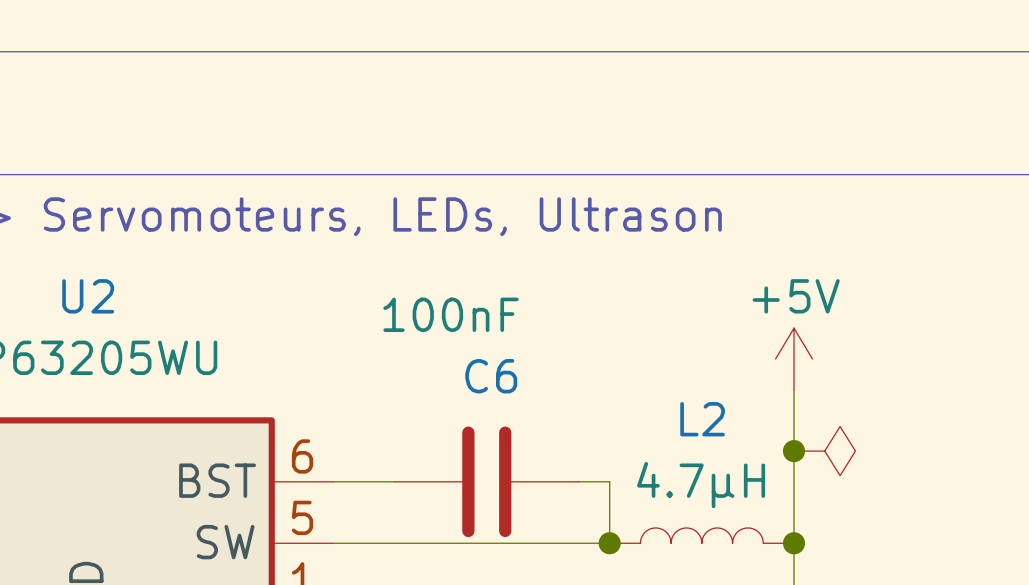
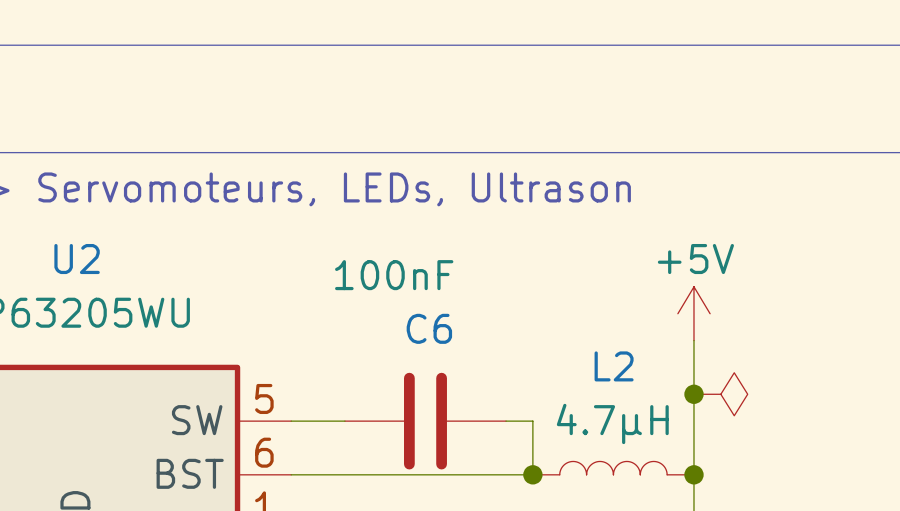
U2 pin number: 6 (302, 456) -> 5 (264, 398)
U2 pin name: BST (217, 480) -> SW (197, 420)
U2 pin number: 5 (302, 517) -> 6 (264, 452)
U2 pin name: SW (225, 542) -> BST (190, 473)

